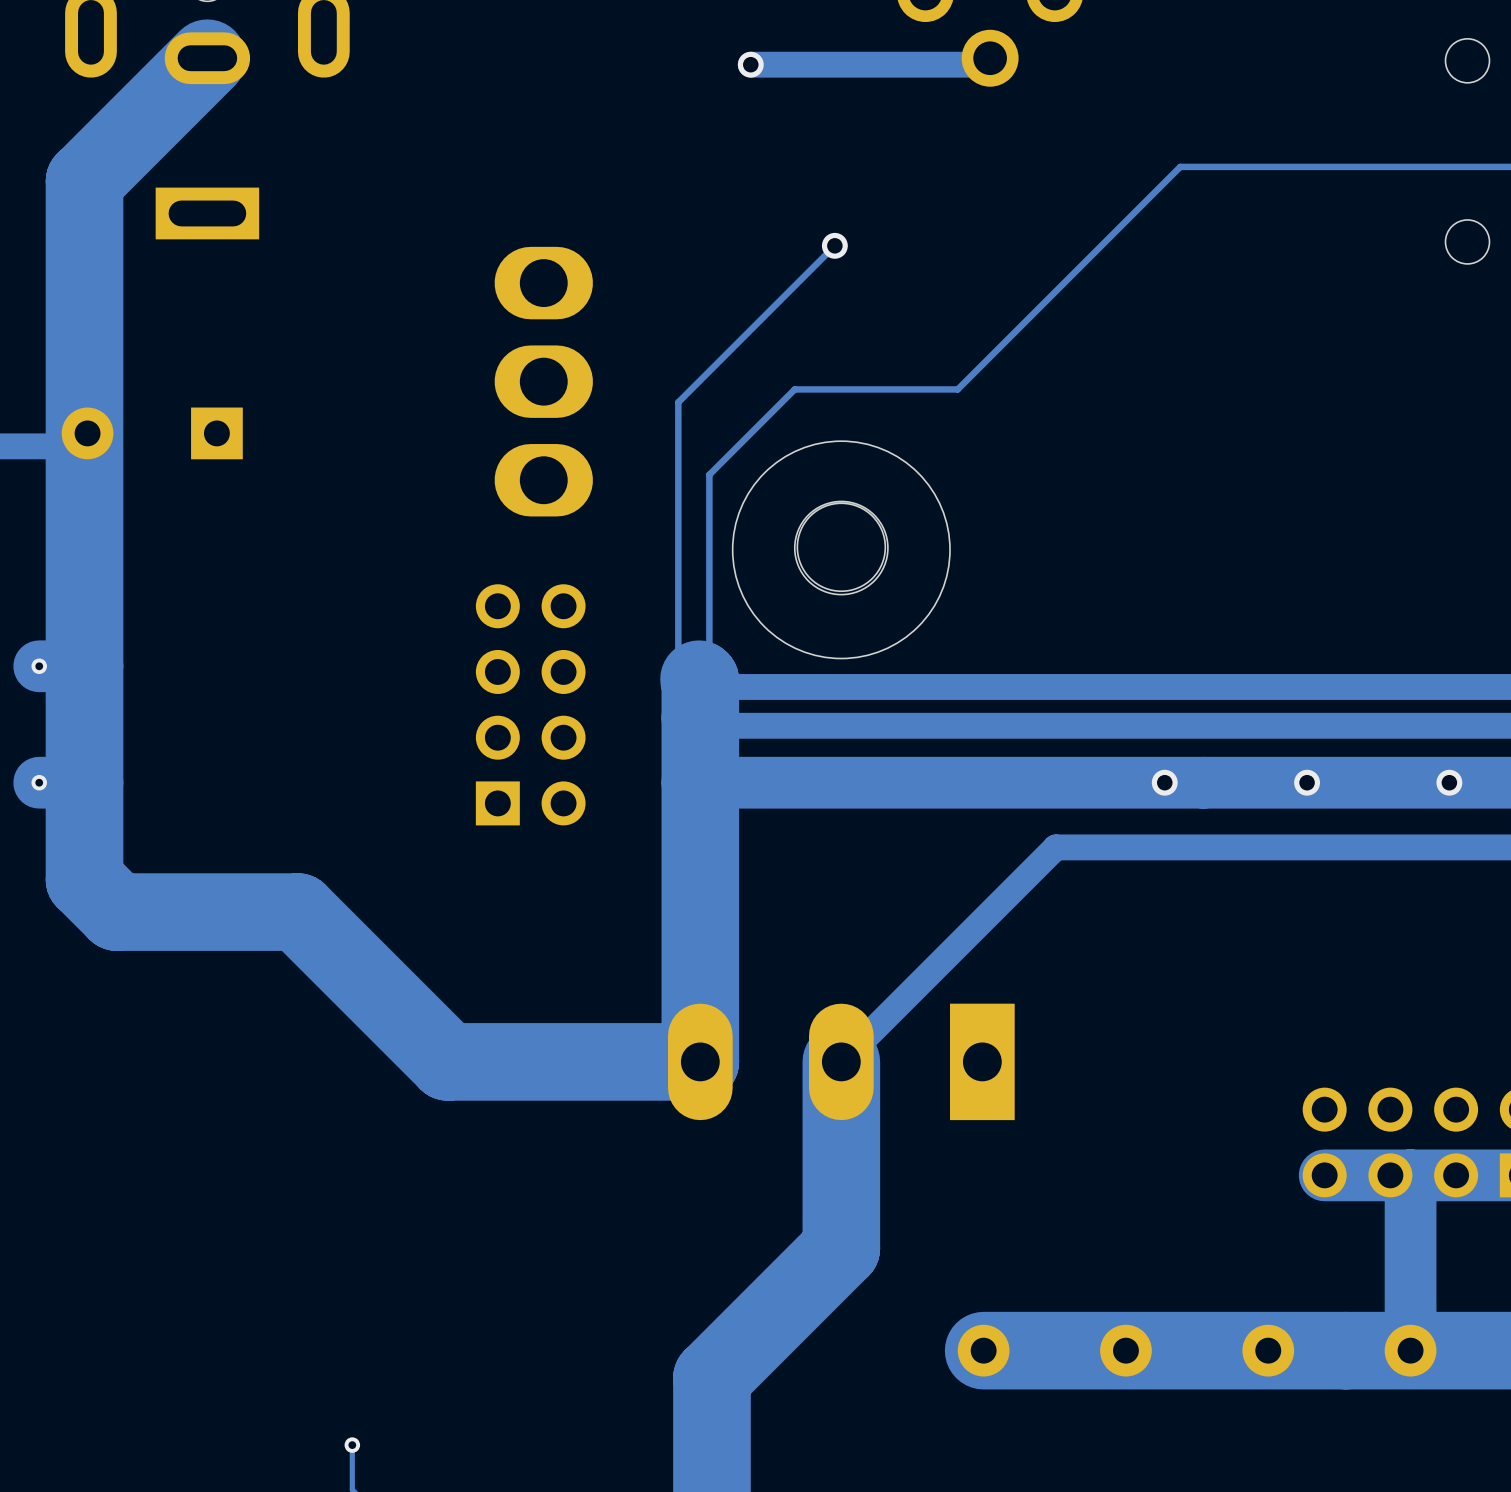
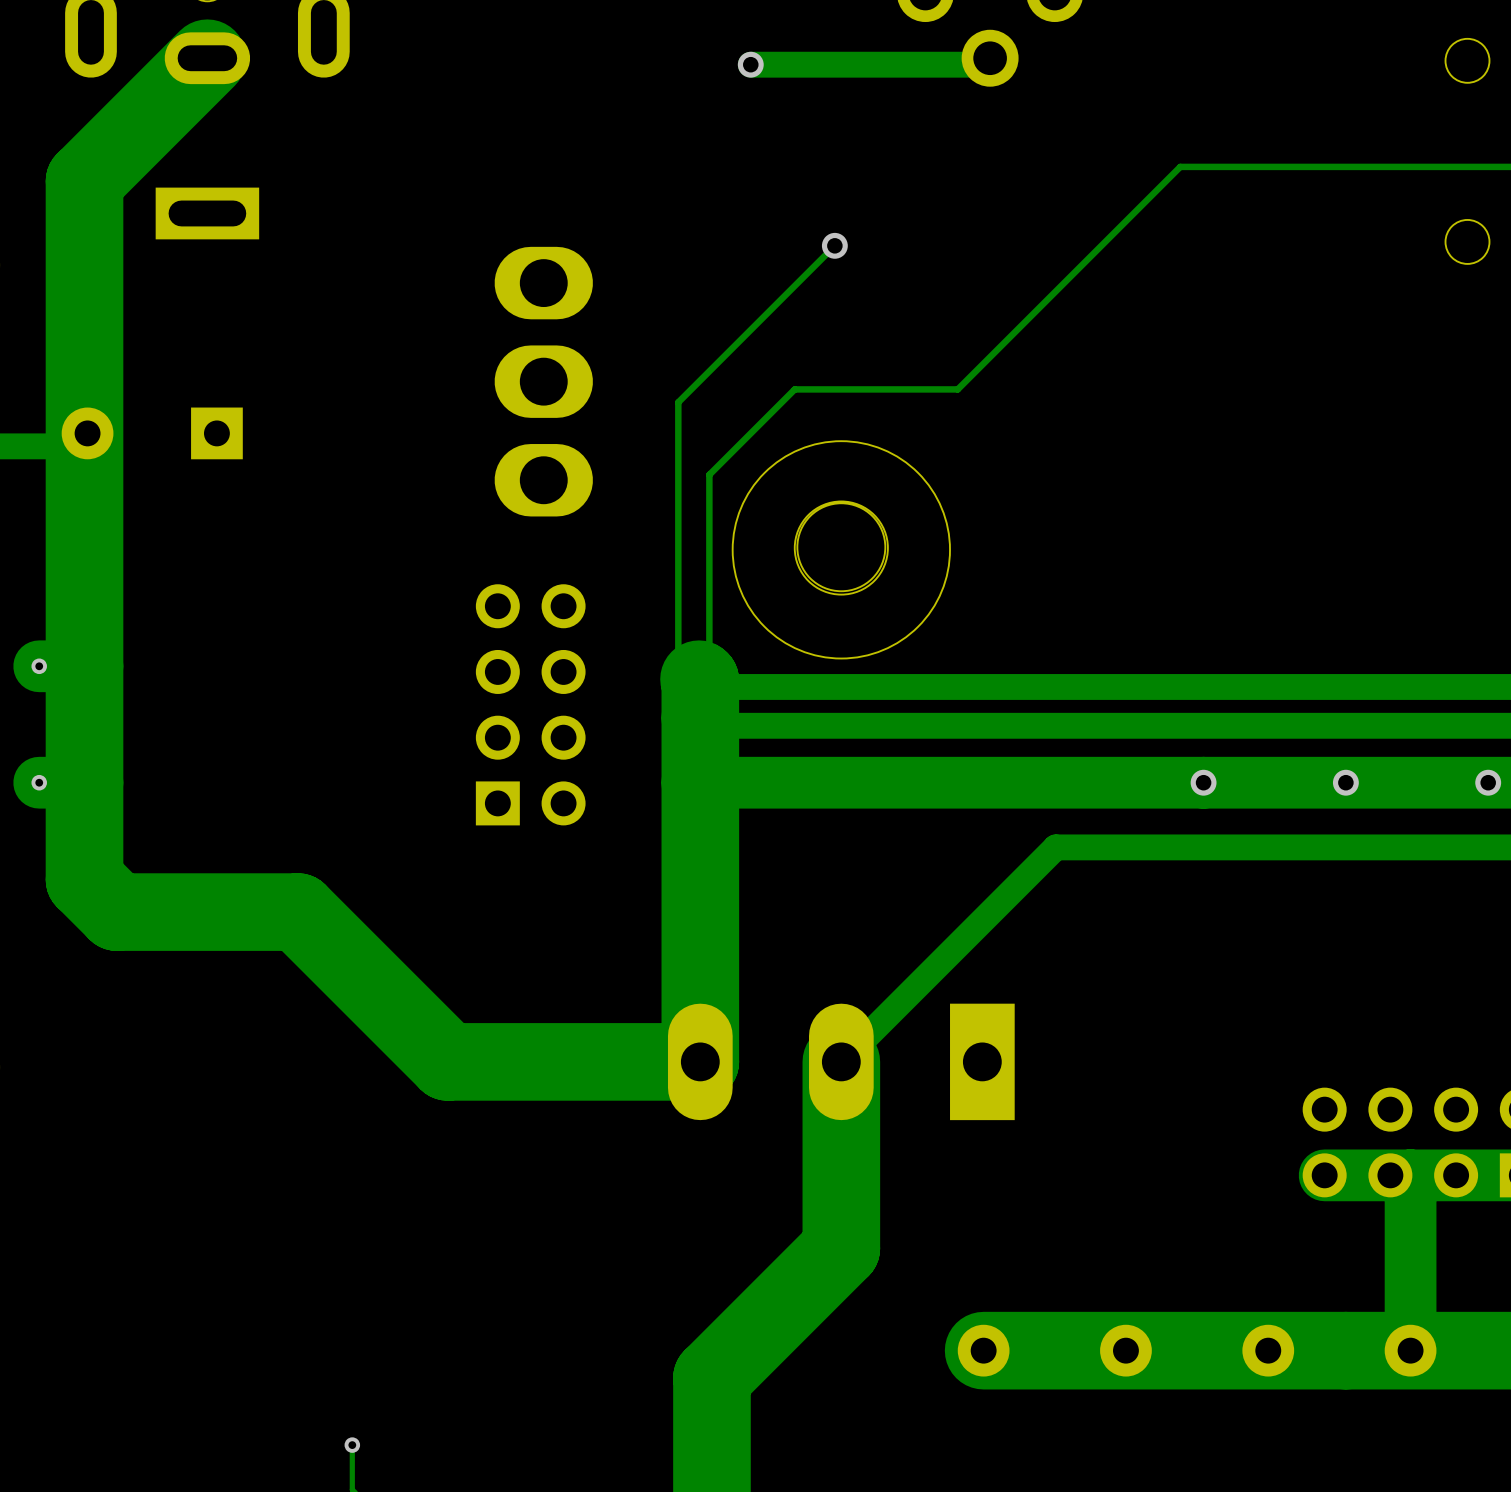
via position: (1164, 782) -> (1203, 782)
via position: (1307, 782) -> (1345, 782)
via position: (1449, 782) -> (1488, 782)

